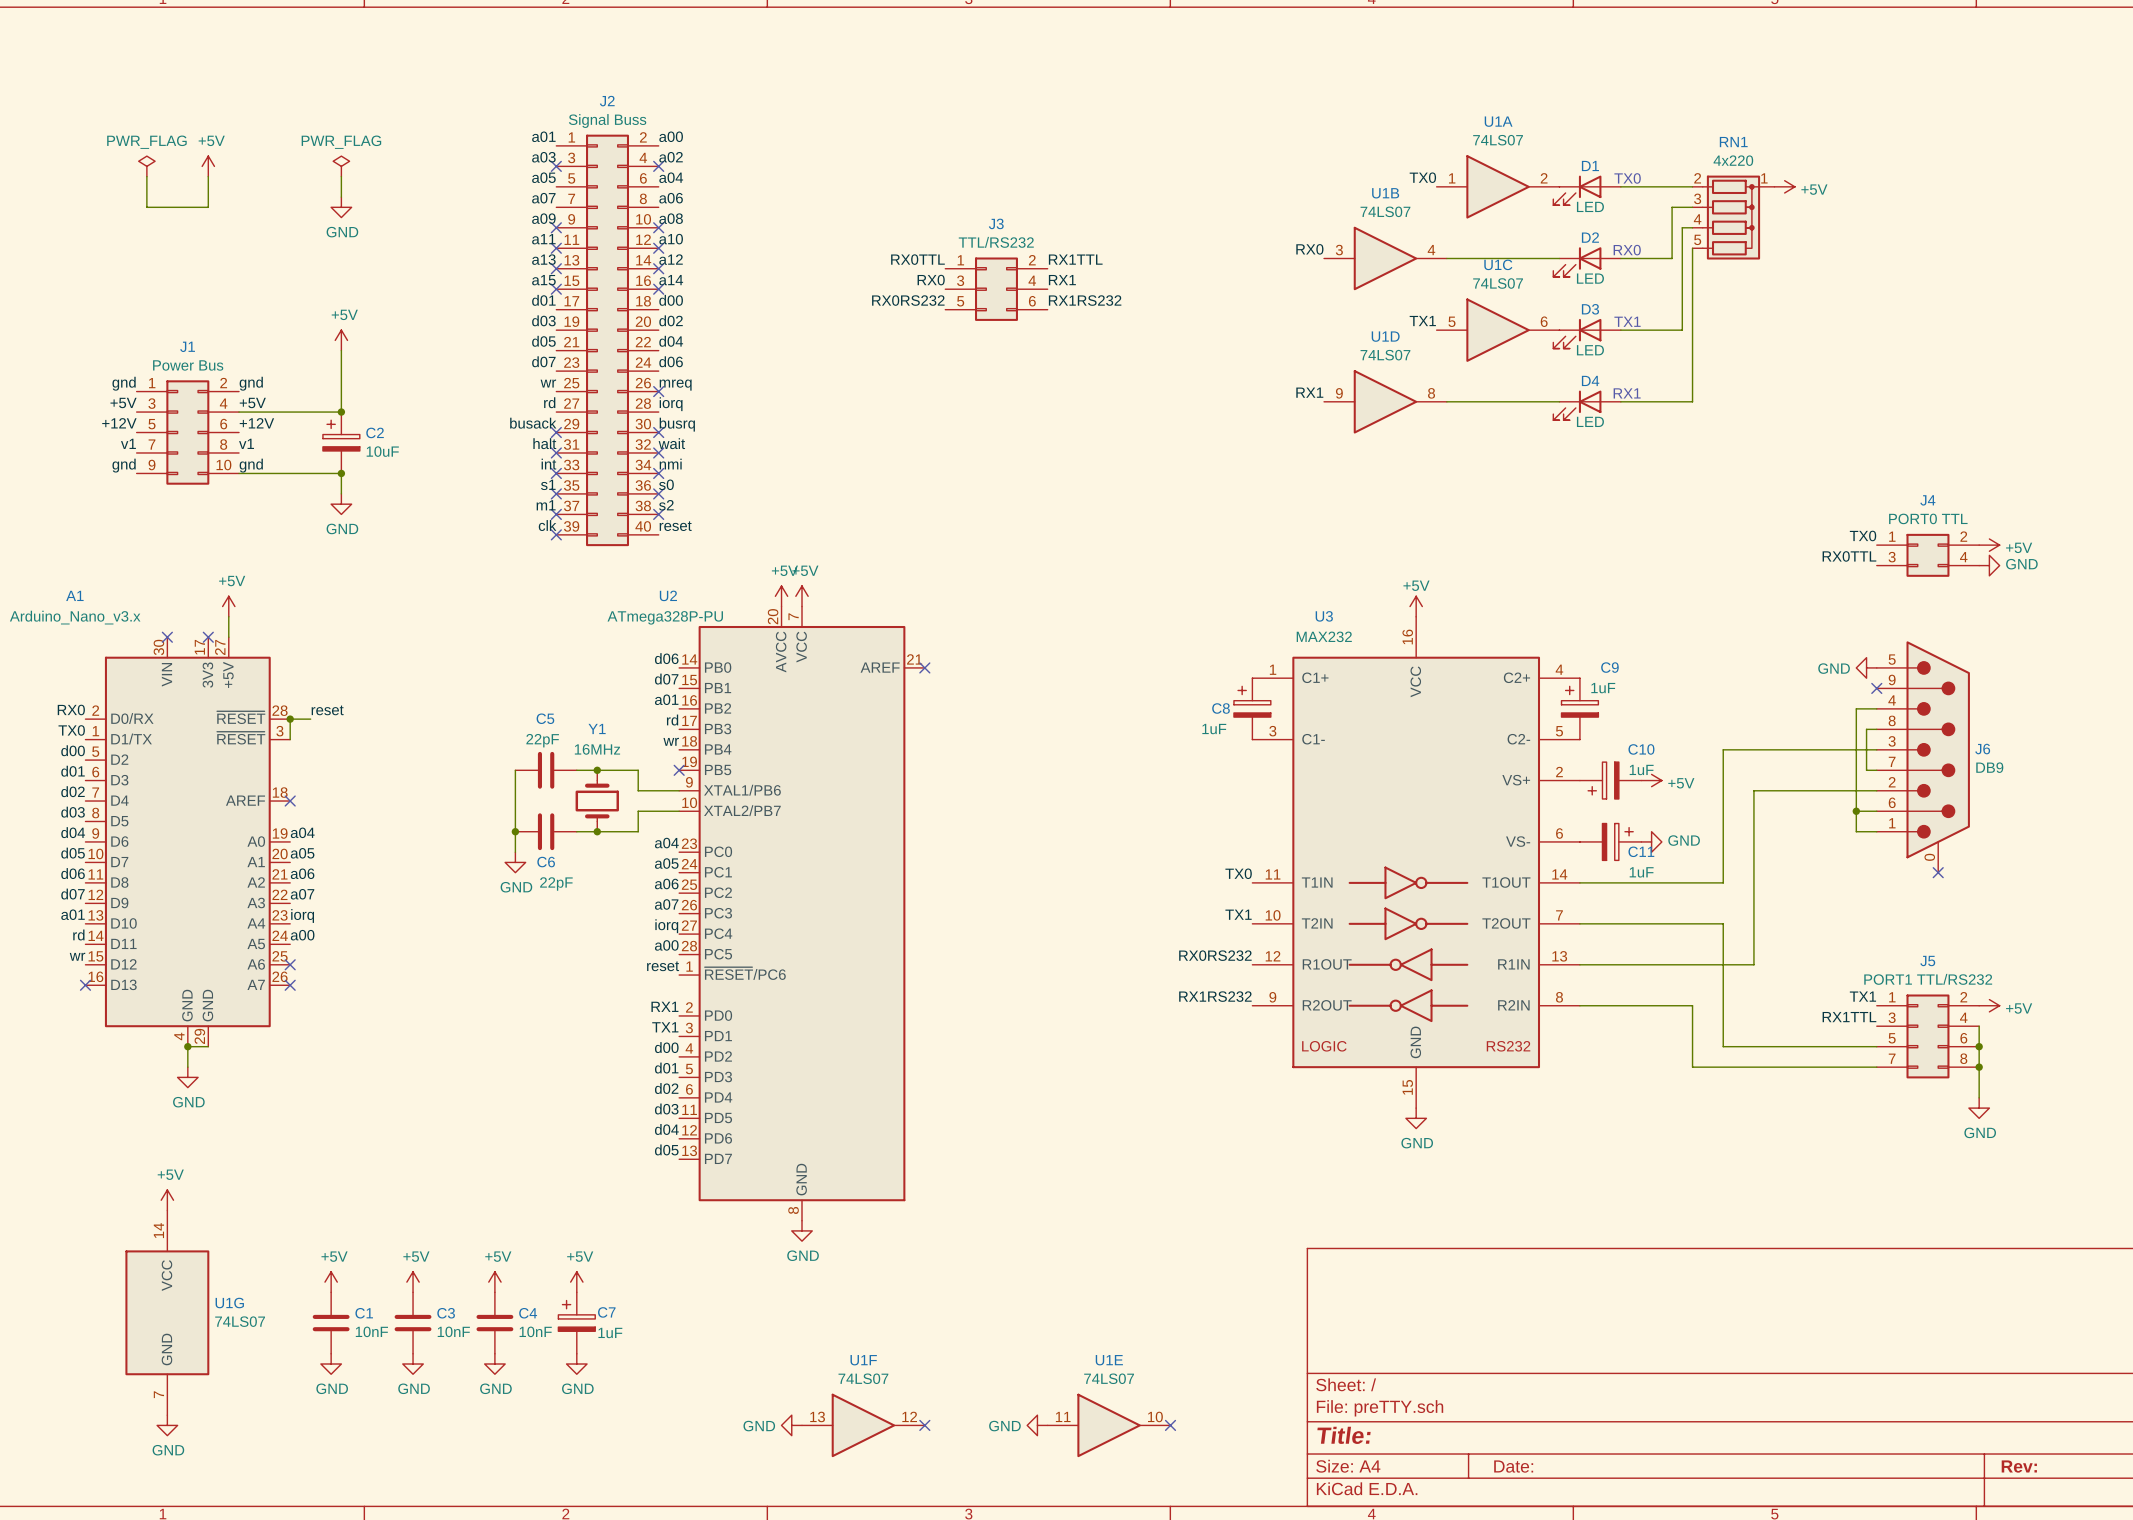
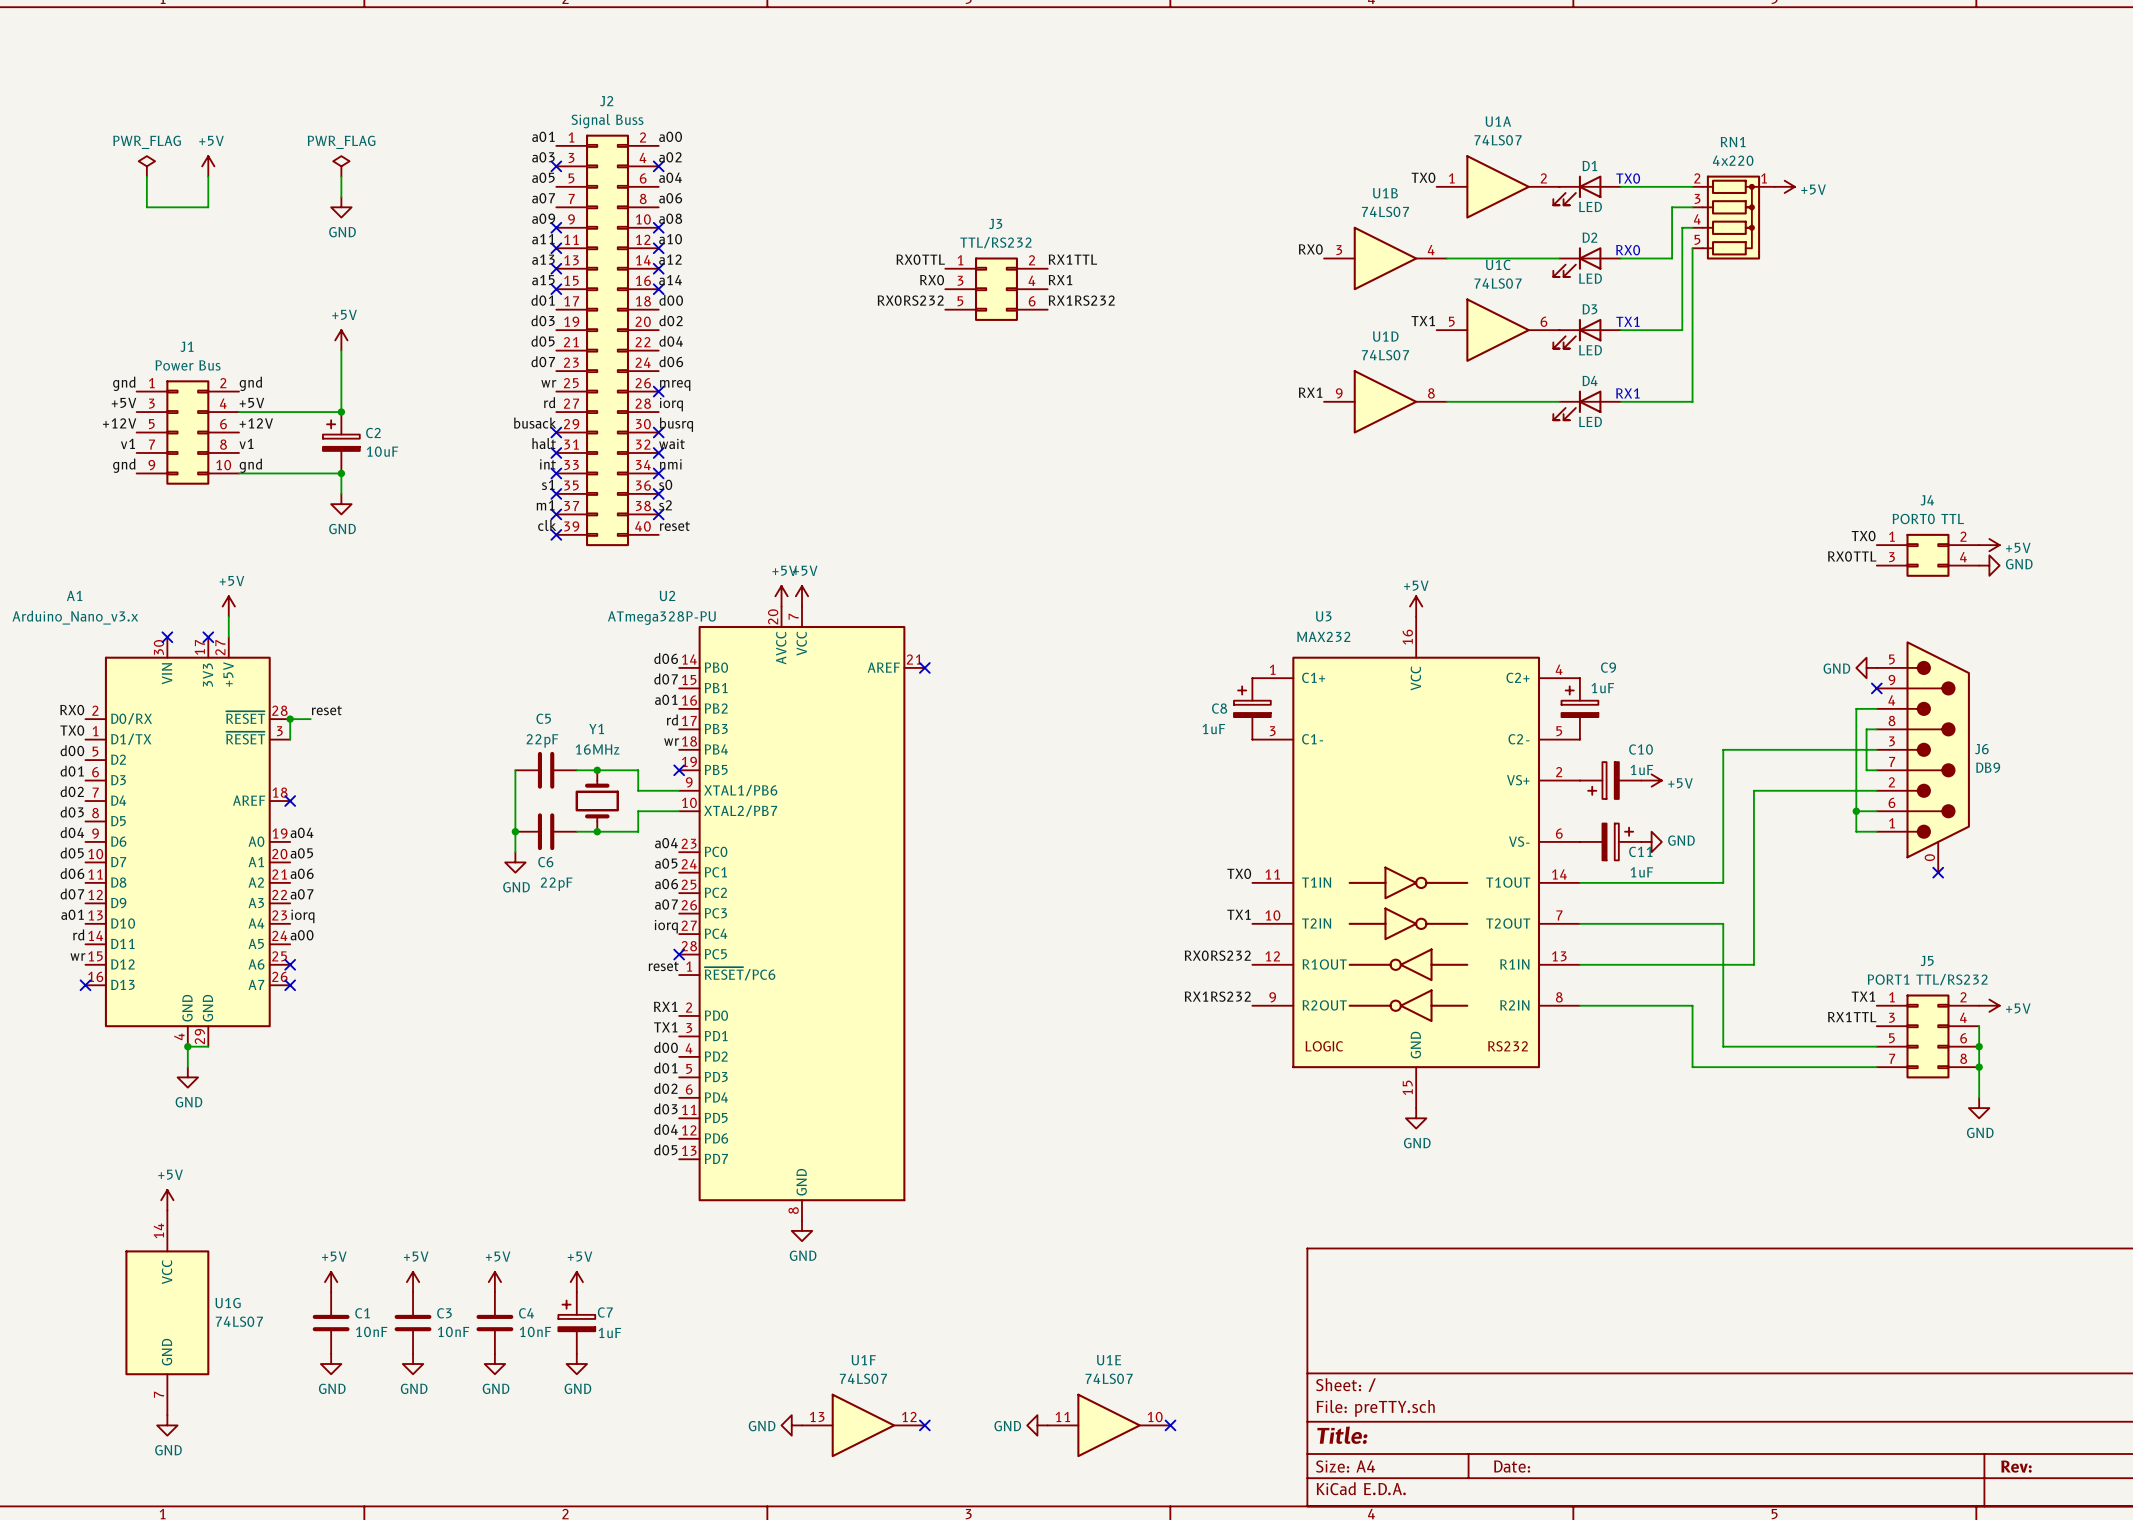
label: a00 (666, 945) -> none
no-connect mark: none -> (679, 954)

